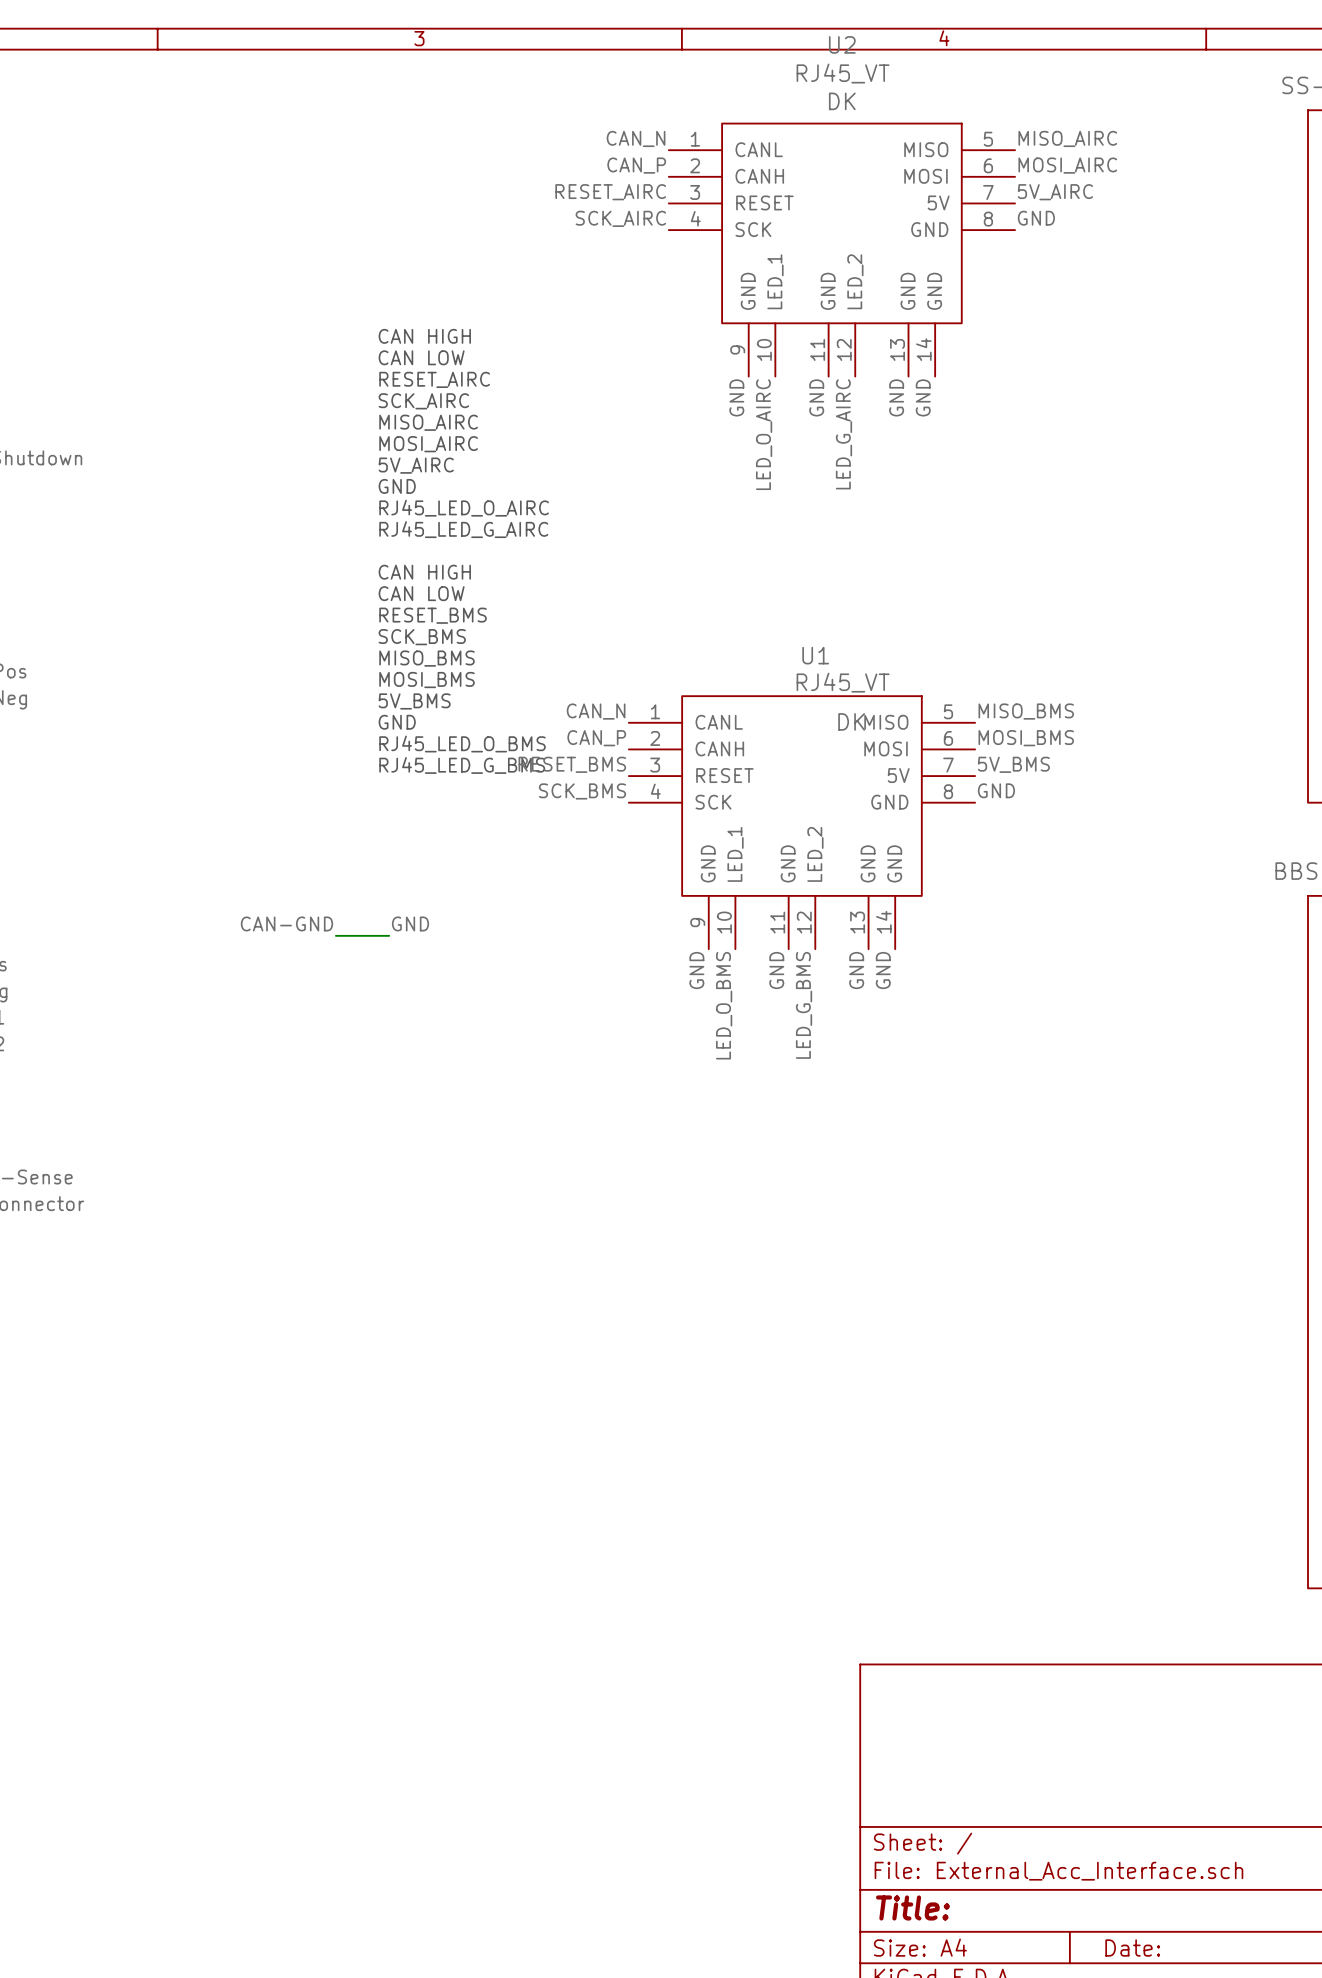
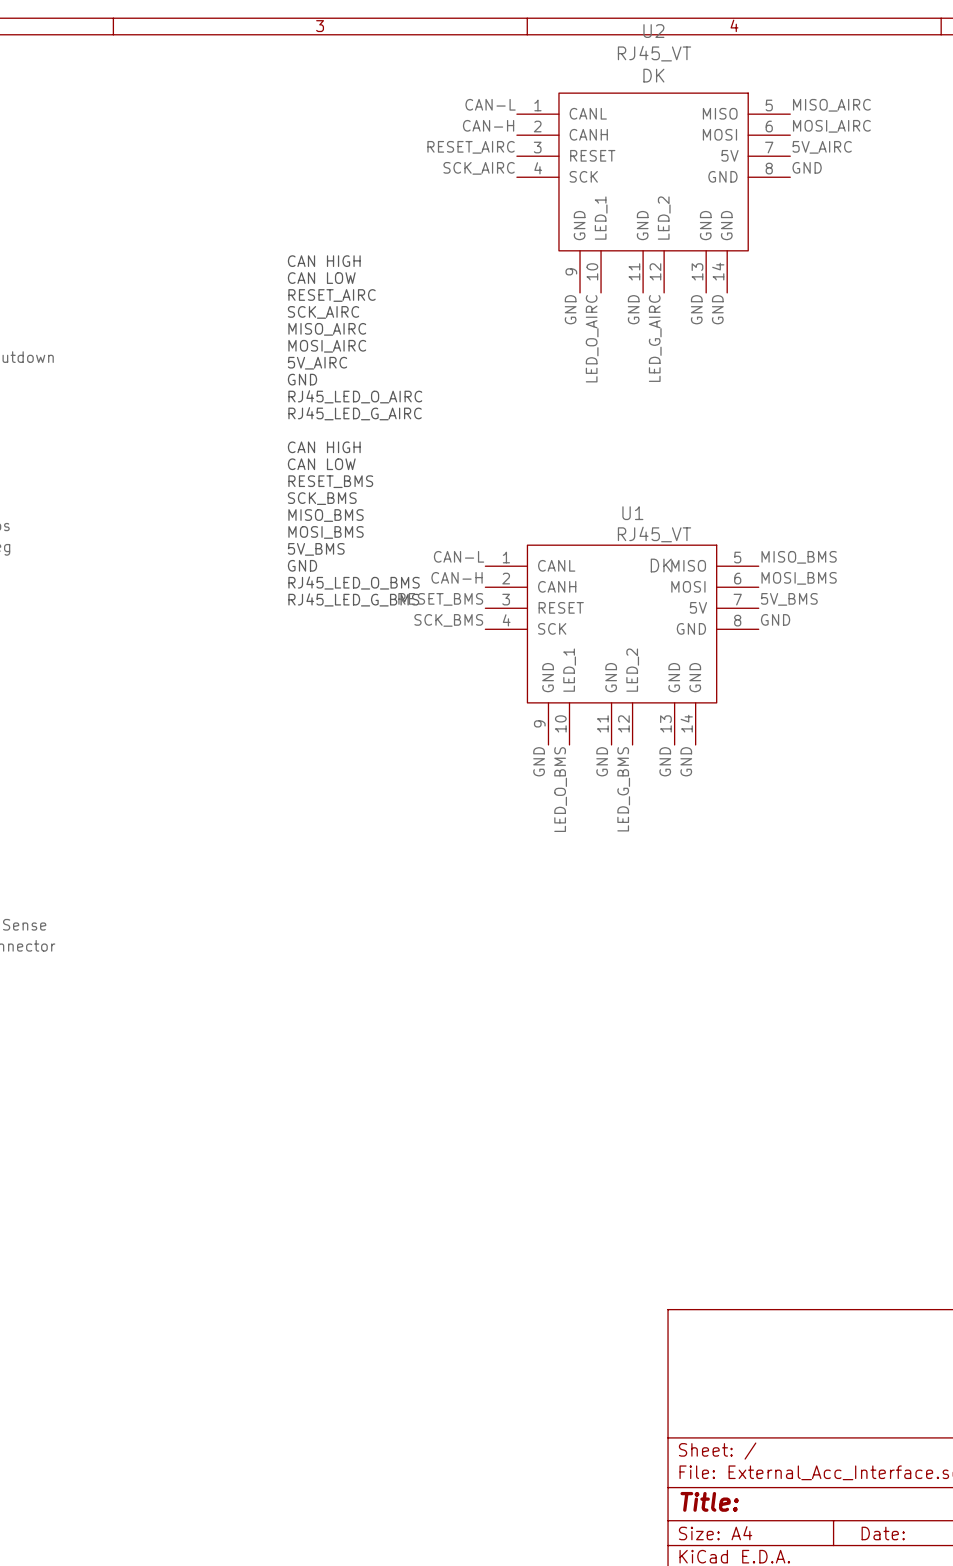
label: CAN_N (636, 138) -> CAN-L (490, 104)
label: CAN_P (636, 165) -> CAN-H (488, 125)
label: CAN_N (596, 711) -> CAN-L (459, 556)
label: CAN_P (596, 738) -> CAN-H (457, 577)
label: CAN-GND (286, 923) -> none
label: GND (410, 923) -> none
wire: (335, 935) (389, 935) -> none

